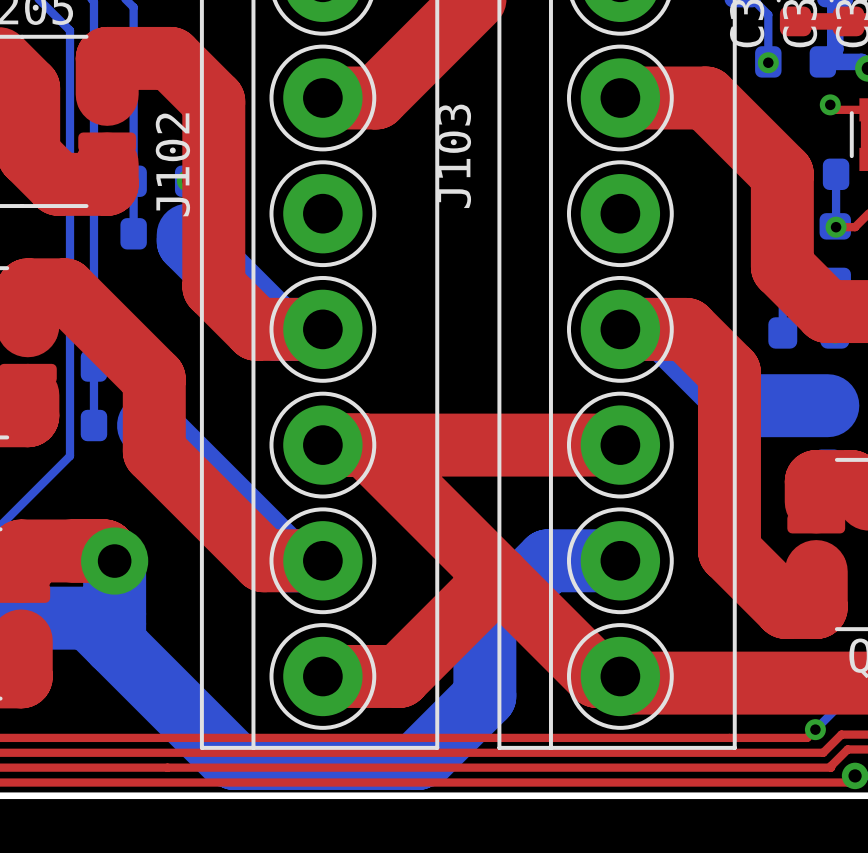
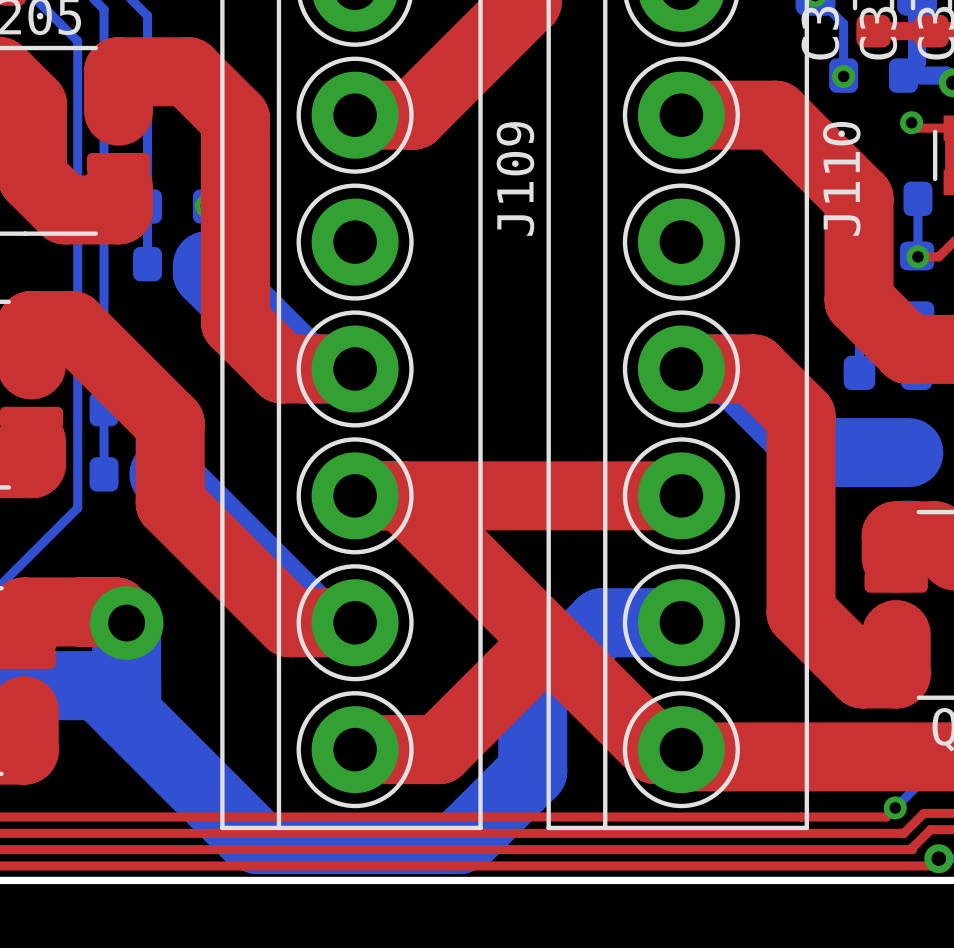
J103 name: J103 (453, 156) -> J110 (841, 178)
J102 name: J102 (172, 164) -> J109 (515, 178)

